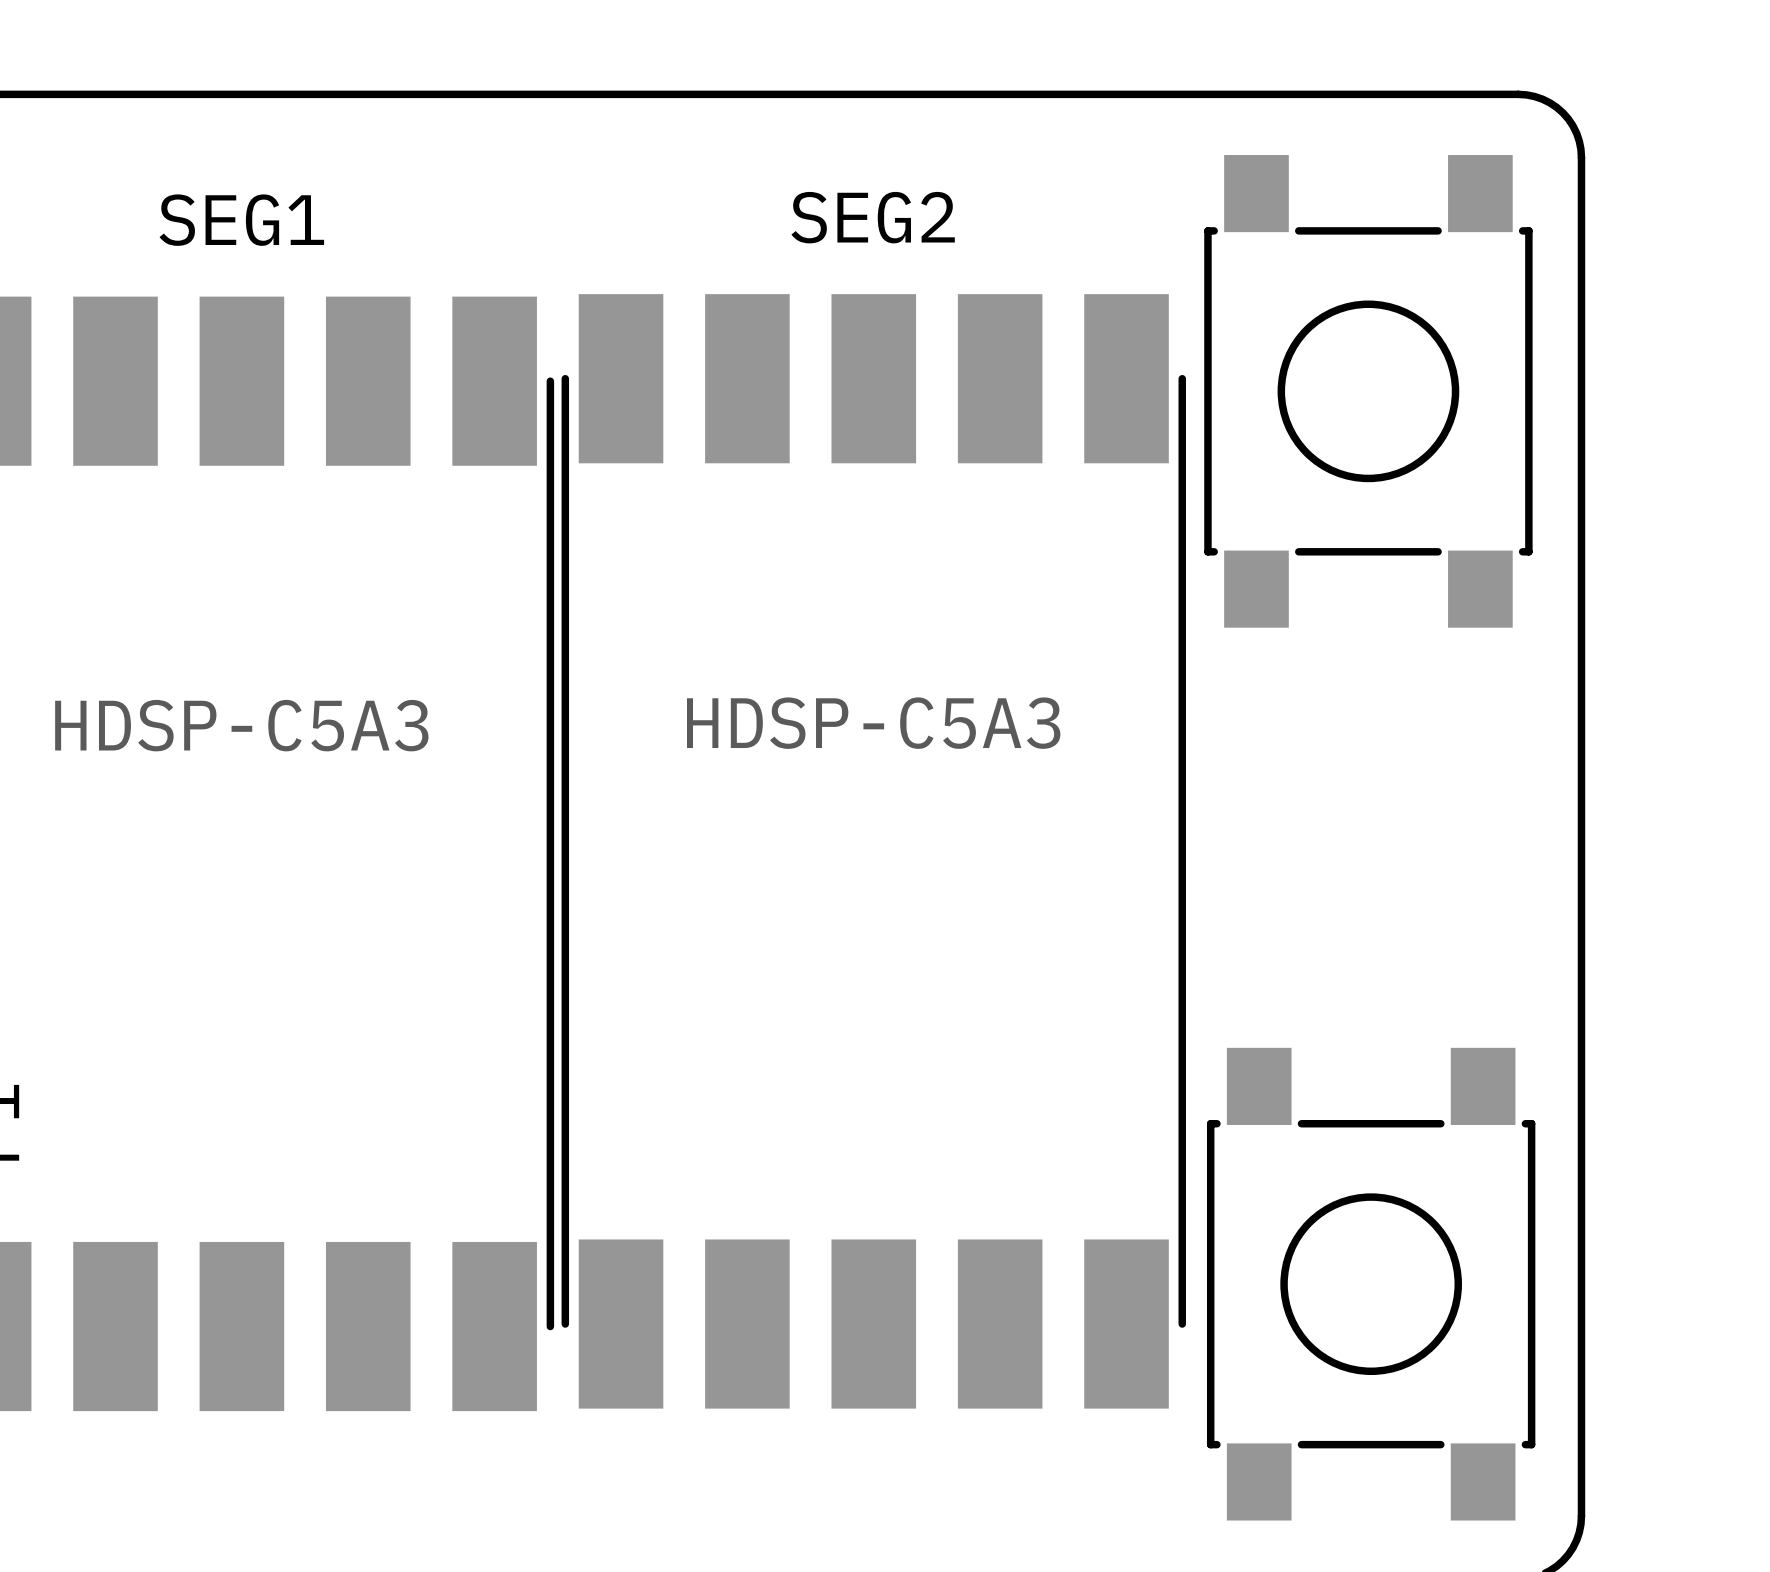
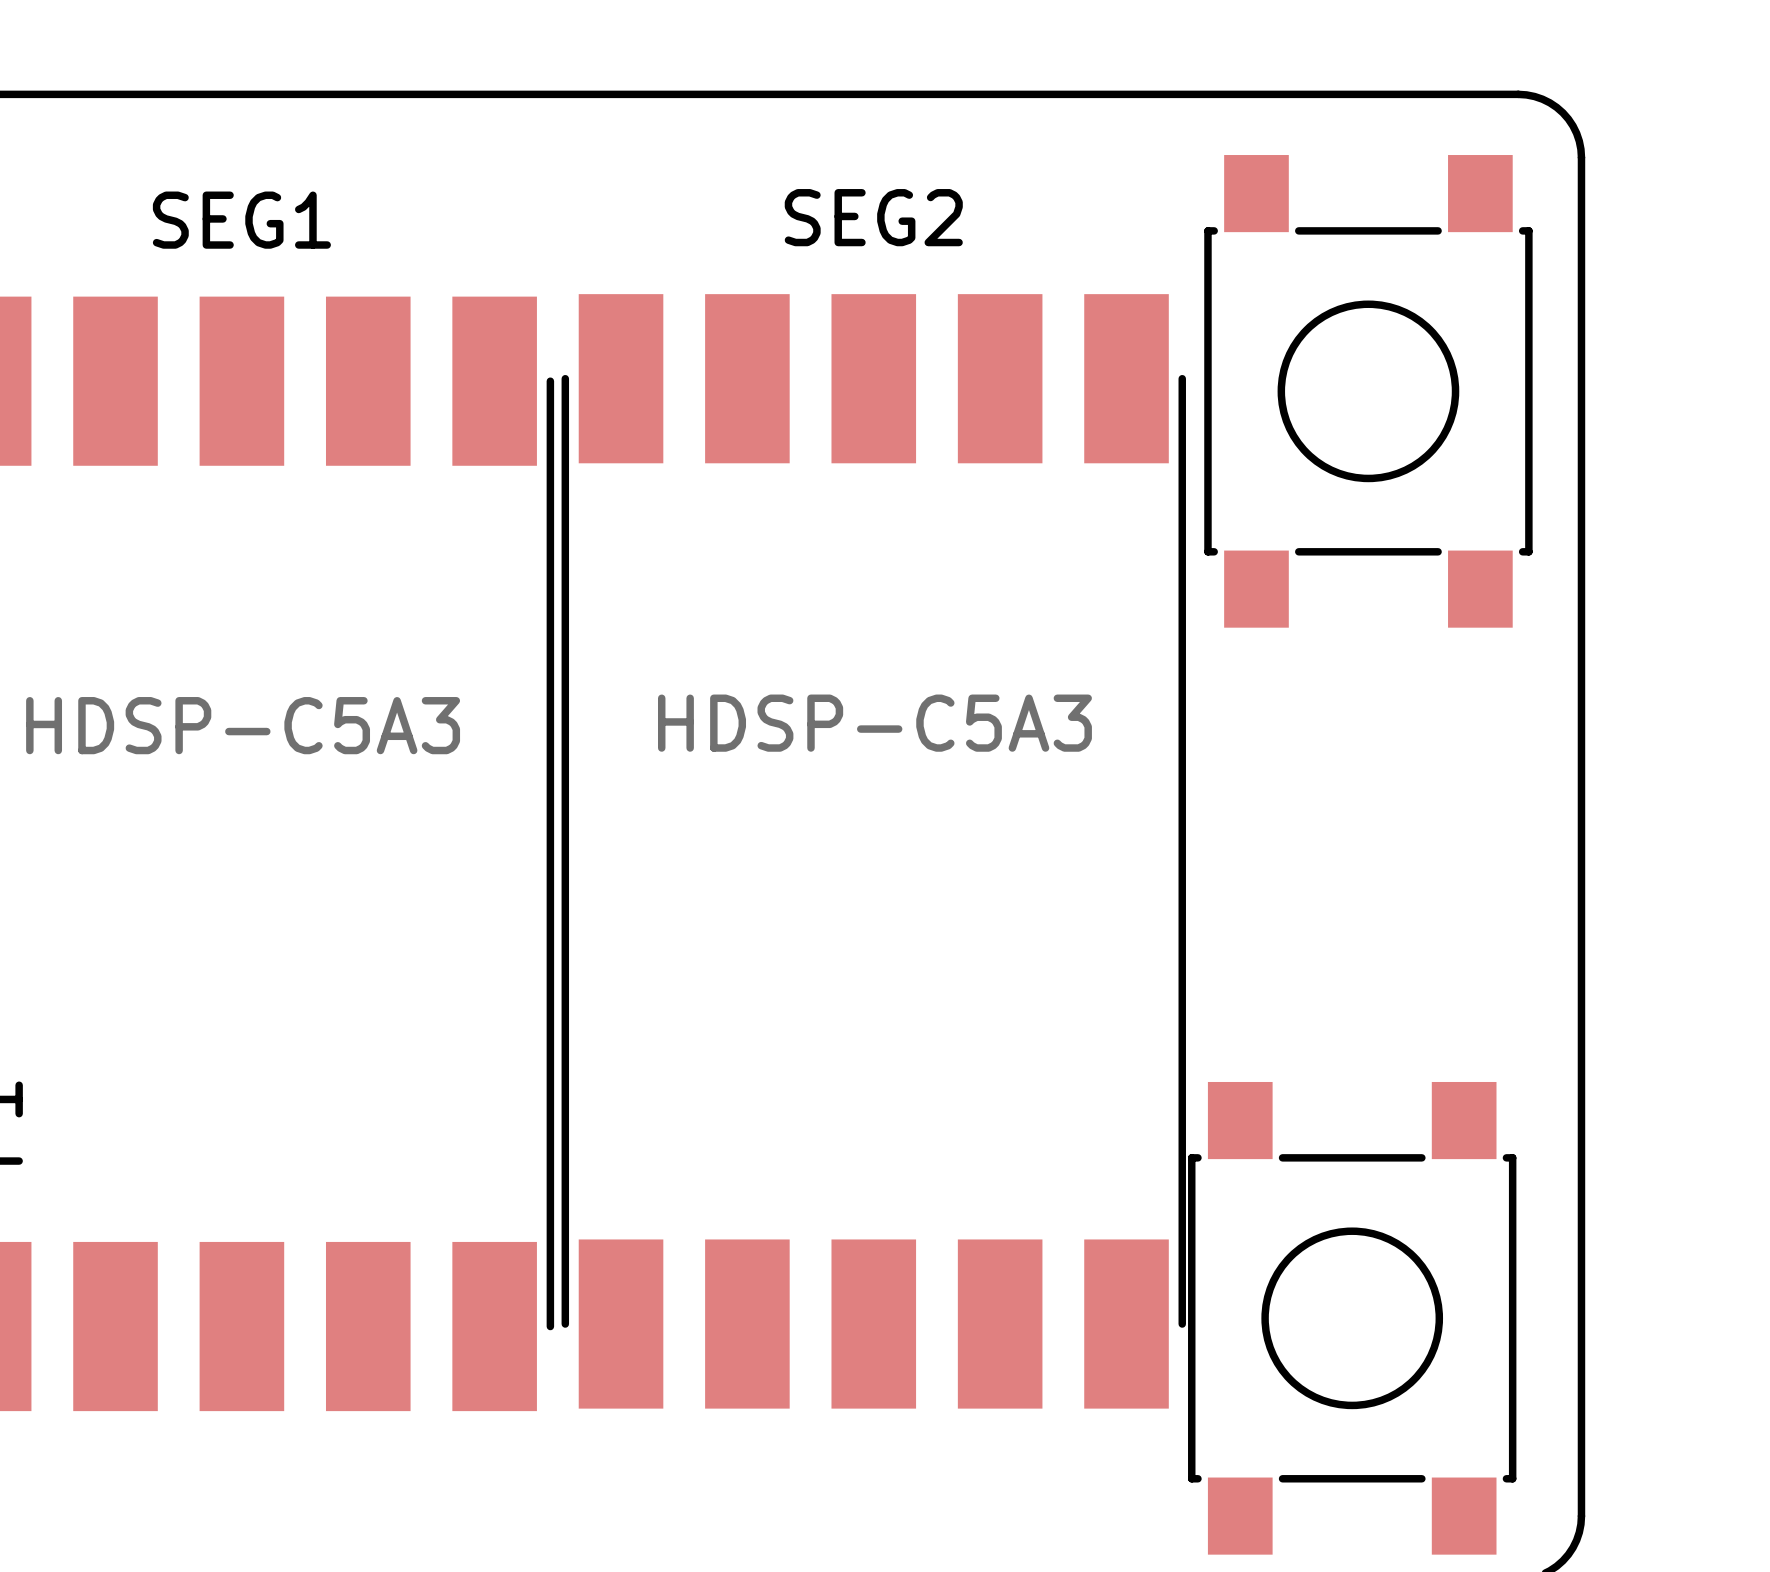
part position: (1371, 1284) -> (1352, 1318)

